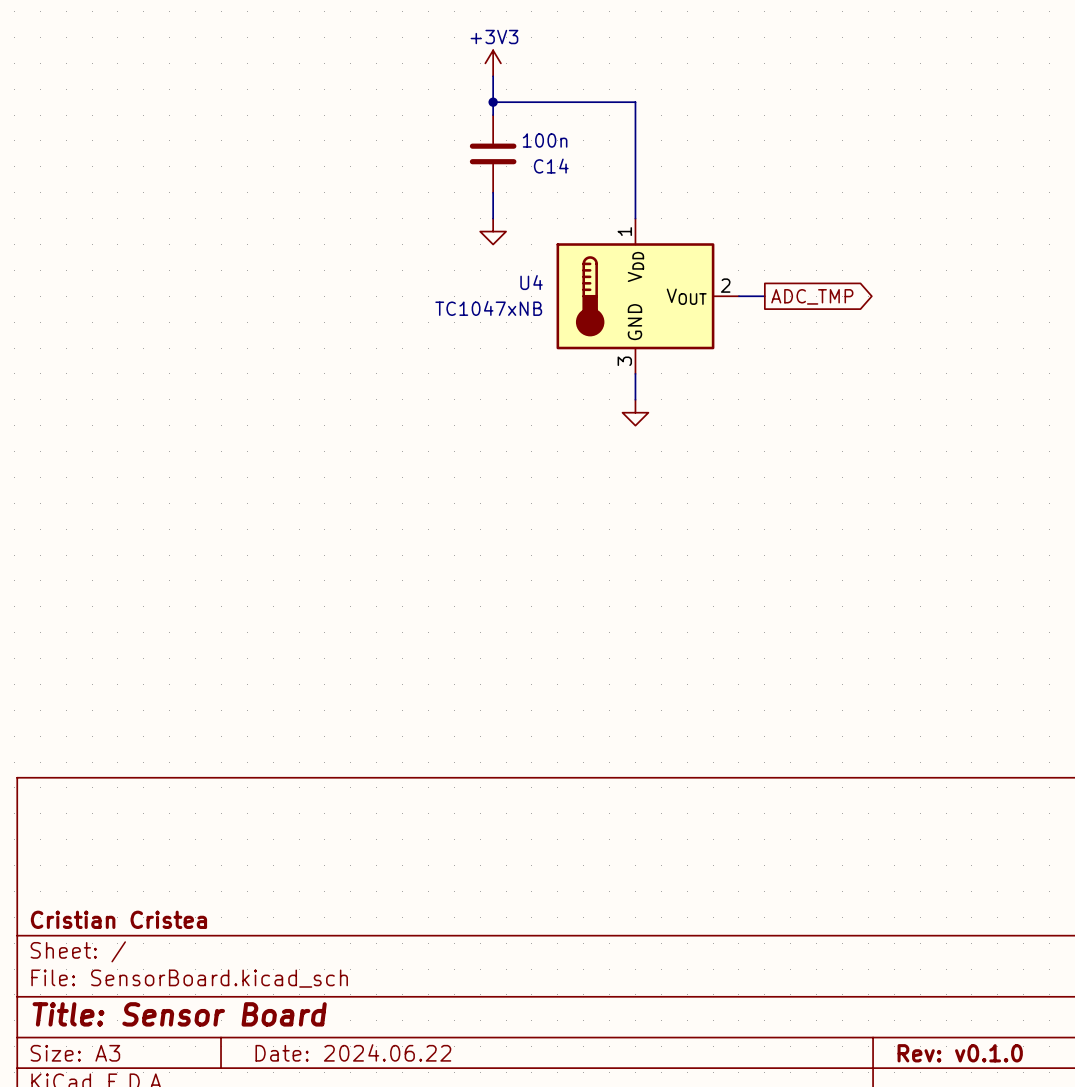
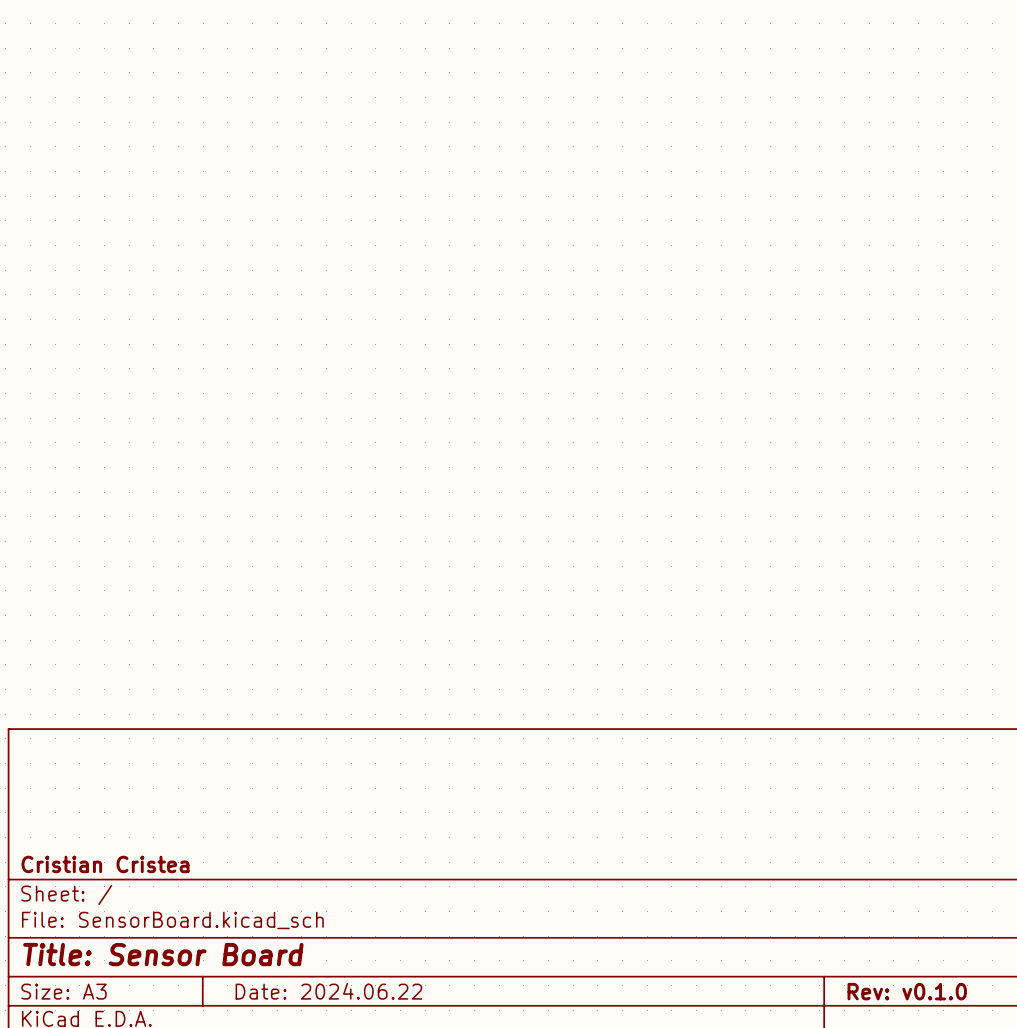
power symbol: +3V3 (493, 63) -> none
wire: (493, 76) (493, 115) -> none
wire: (493, 102) (635, 102) (635, 218) -> none
junction: (493, 102) -> none
C14: 100n (493, 153) -> none
wire: (493, 192) (493, 218) -> none
power symbol: (493, 231) -> none
U4: TC1047xNB (647, 296) -> none
wire: (738, 296) (764, 296) -> none
global label: ADC_TMP (812, 296) -> none
wire: (635, 373) (635, 399) -> none
power symbol: (635, 412) -> none

